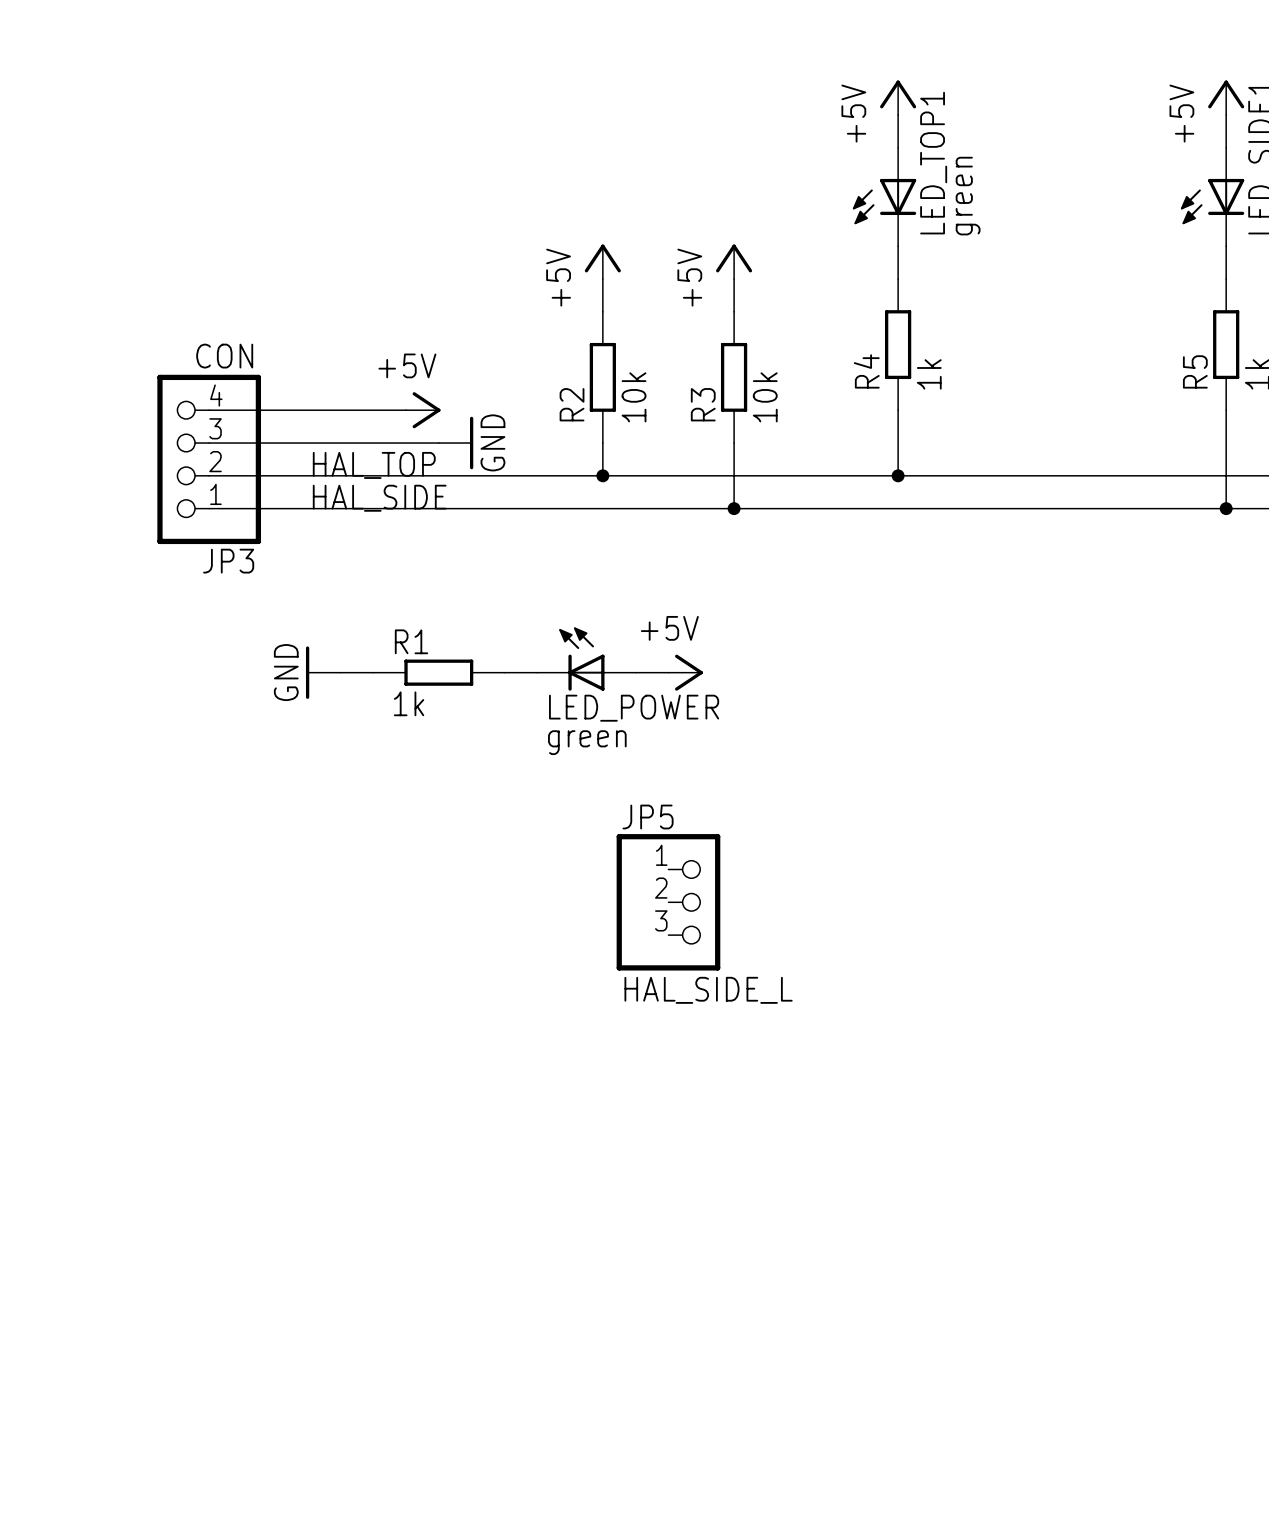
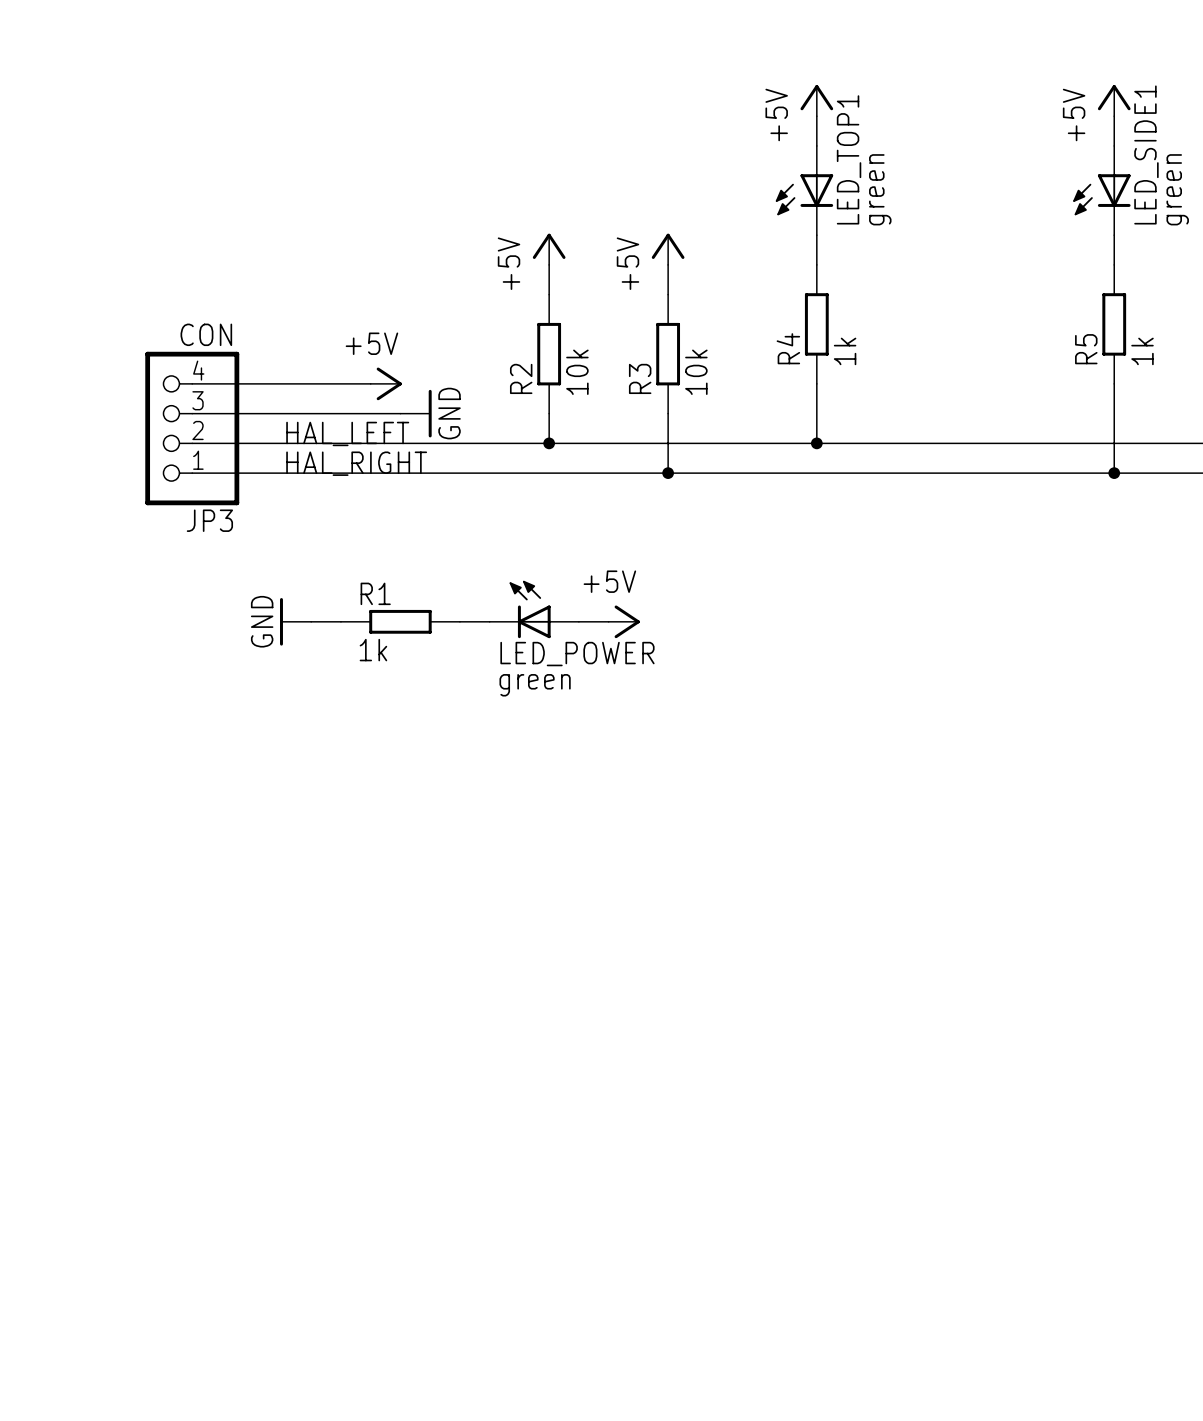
label: HAL_TOP (374, 465) -> HAL_LEFT (347, 433)
label: HAL_SIDE (379, 498) -> HAL_RIGHT (356, 463)
JP5: HAL_SIDE_L (668, 902) -> none

